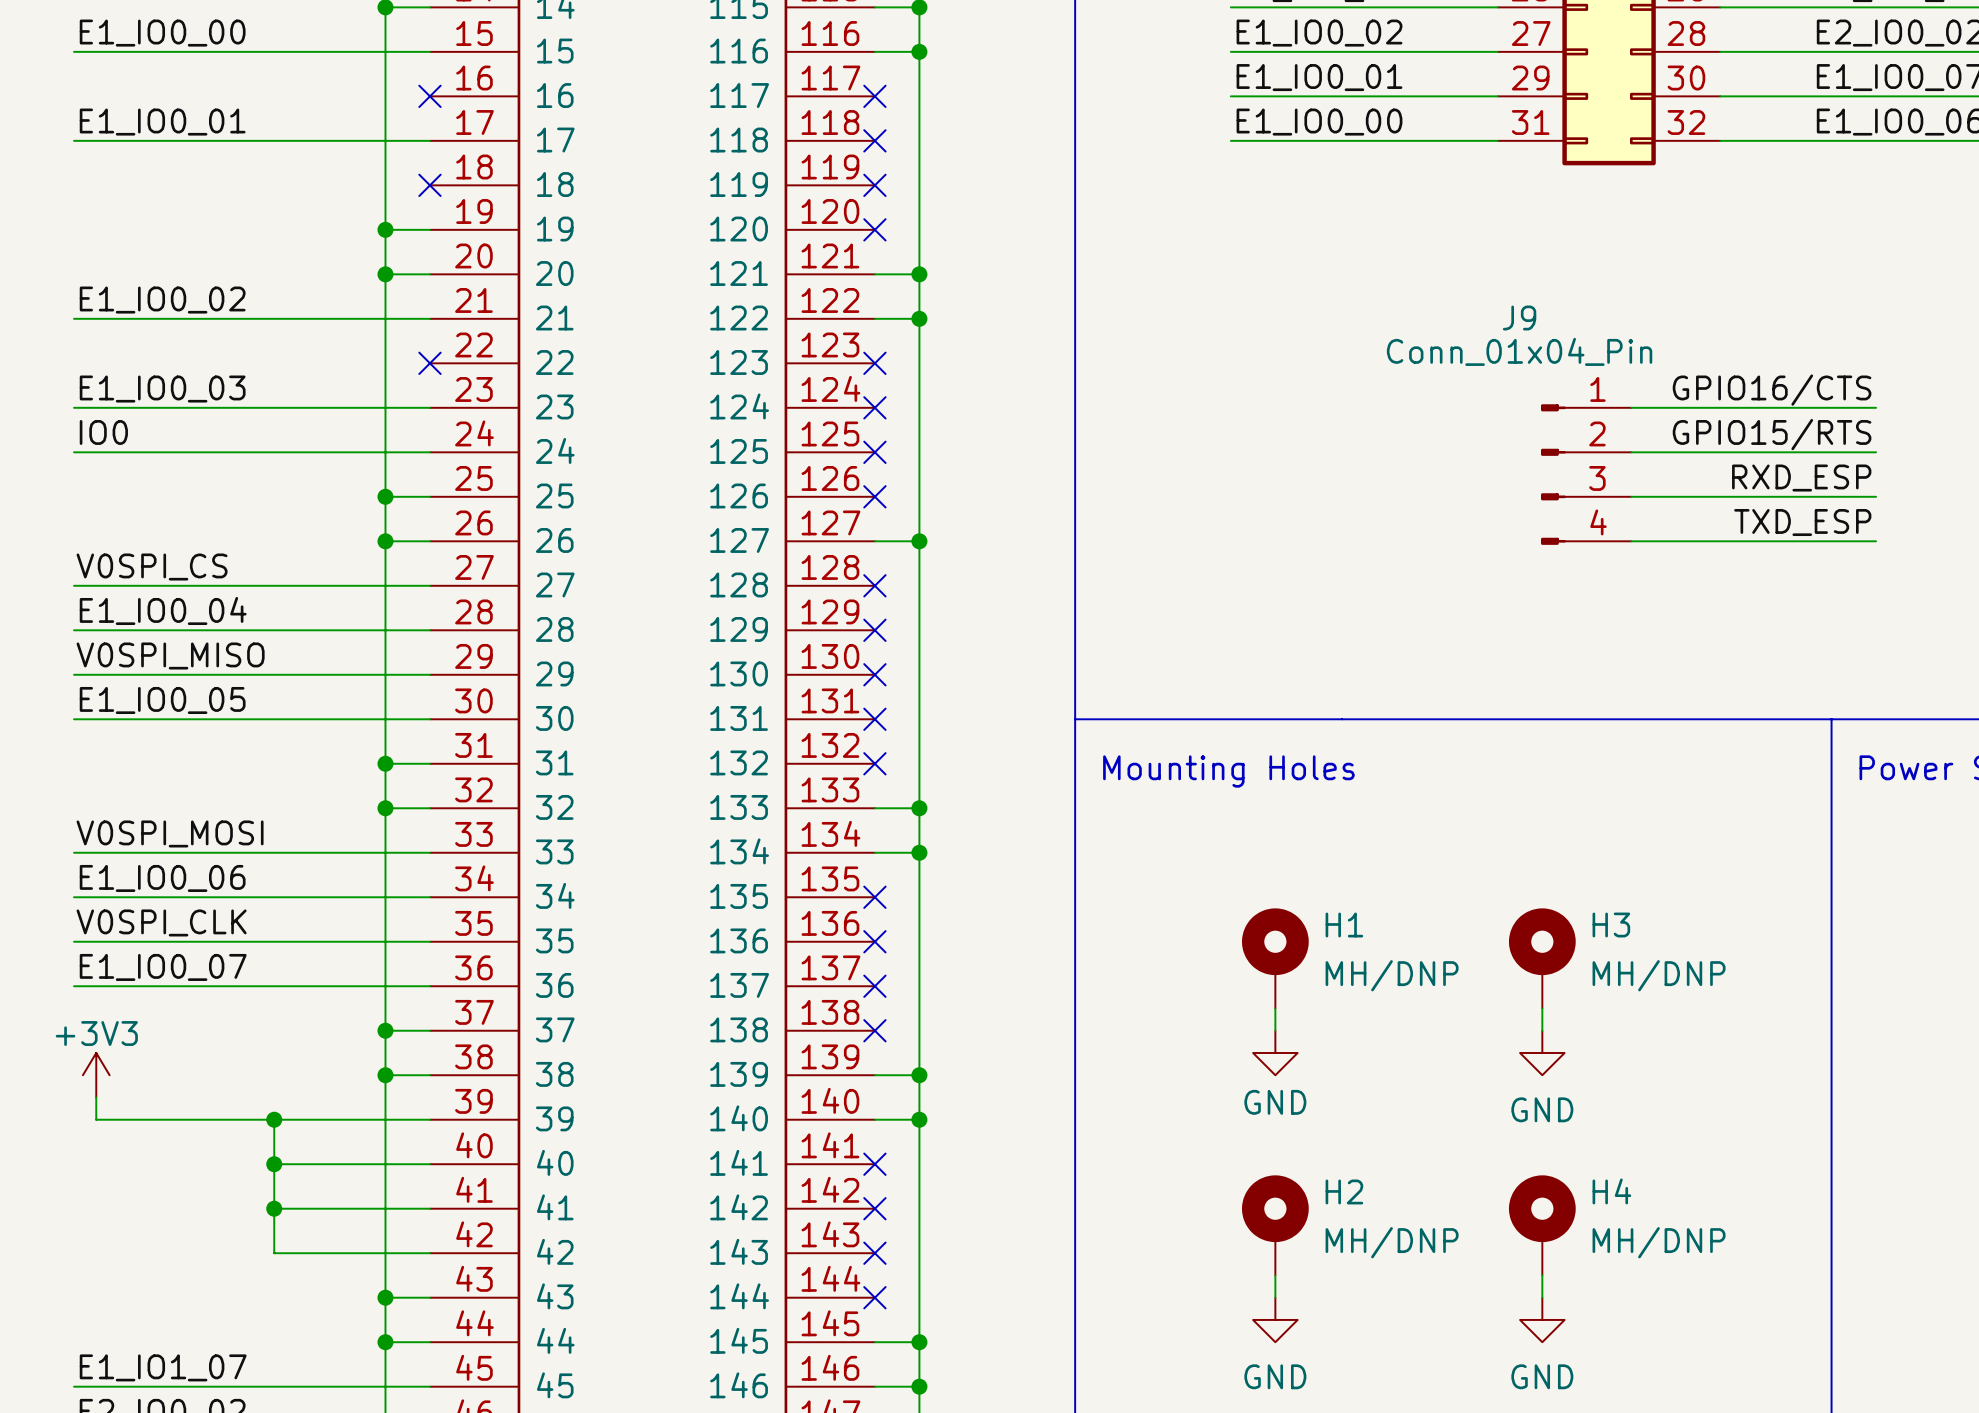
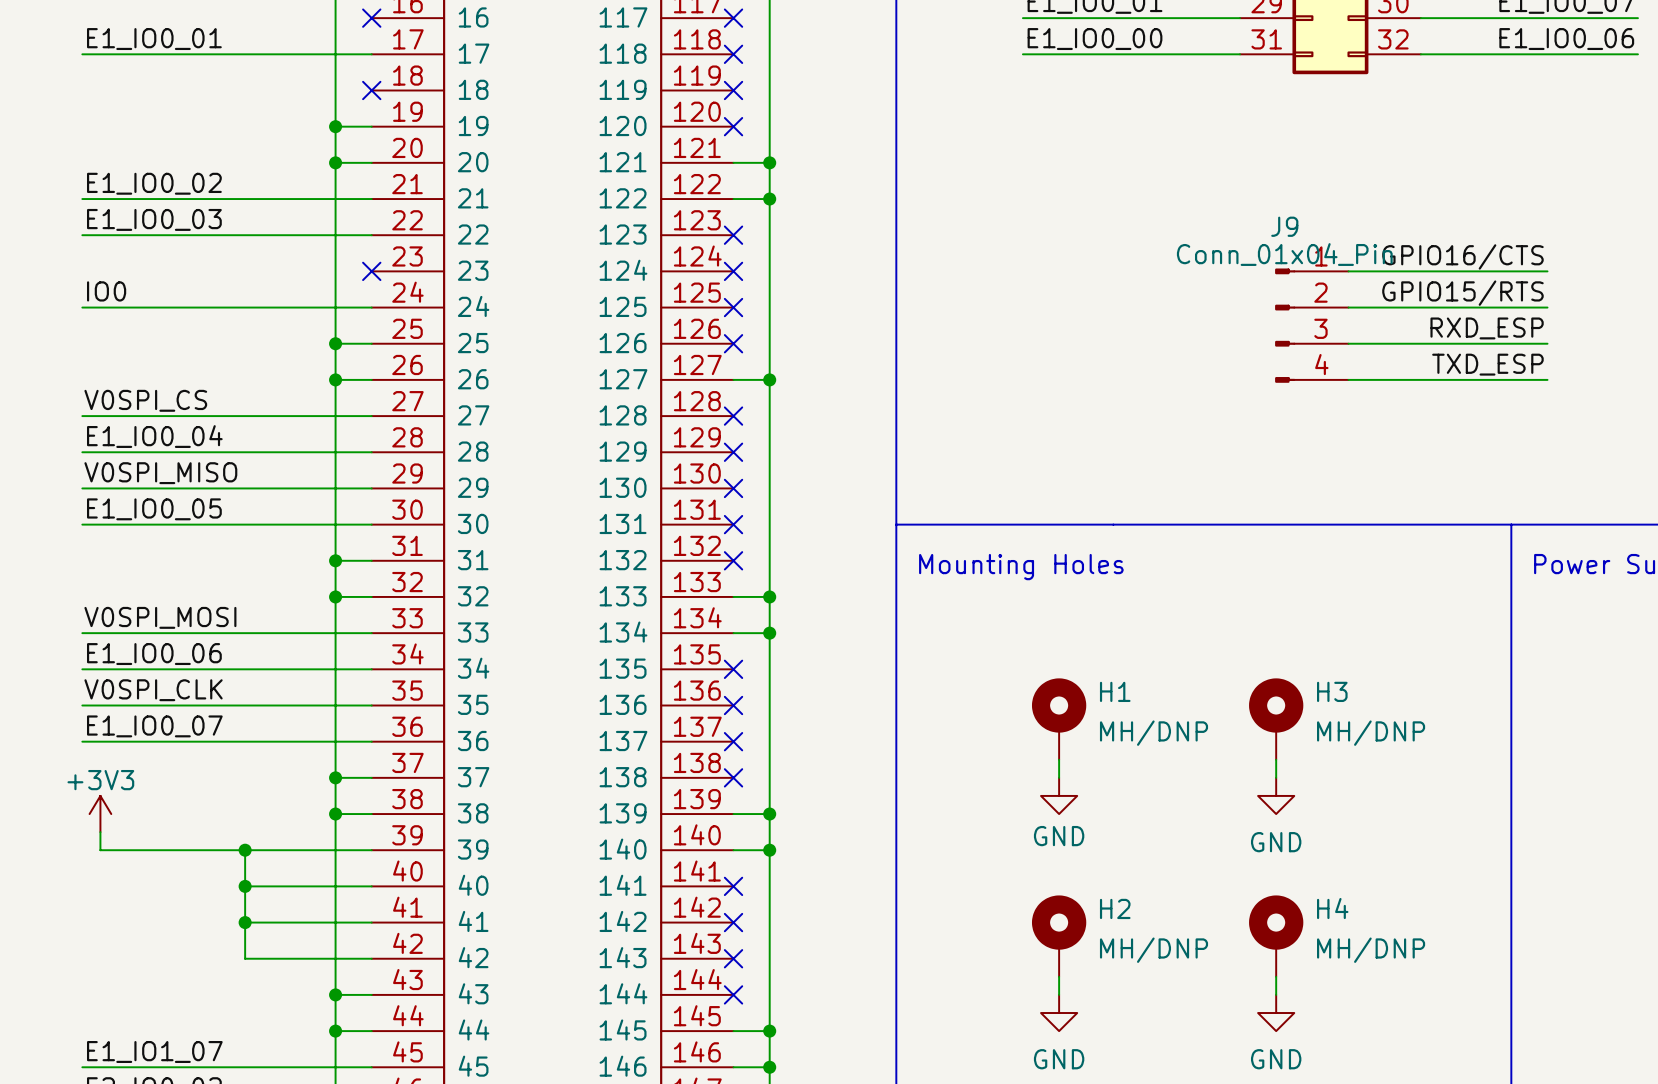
J9 name position: J9 (1519, 318) -> J9 (1284, 226)
J9 value position: Conn_01x04_Pin (1519, 351) -> Conn_01x04_Pin (1284, 254)
no-connect mark position: (429, 363) -> (371, 271)
label position: E1_IO0_03 (162, 389) -> E1_IO0_03 (154, 219)
wire: (74, 407) (429, 407) -> (82, 235) (371, 235)

